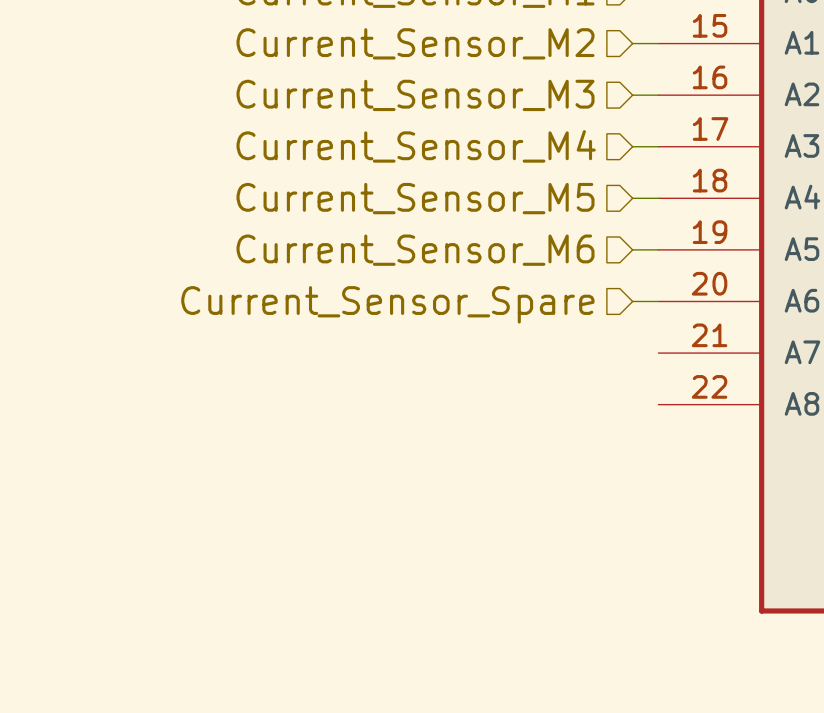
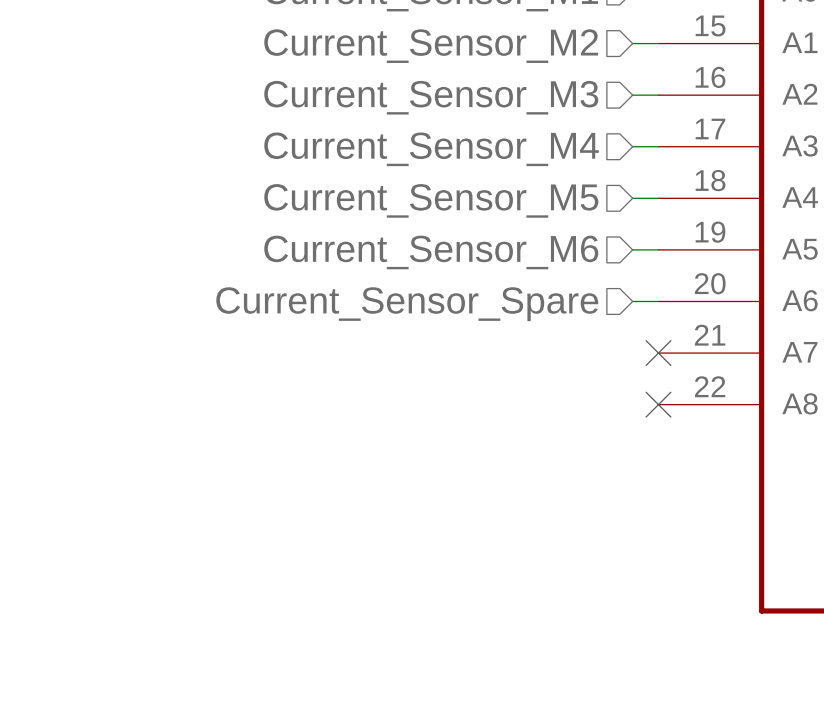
no-connect mark: none -> (658, 353)
no-connect mark: none -> (658, 404)

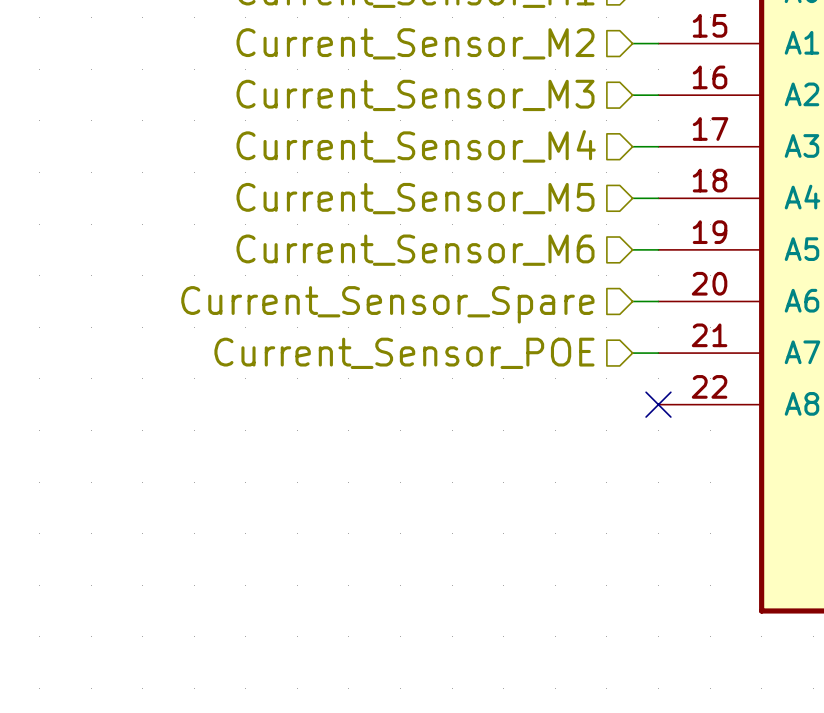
wire: none -> (632, 353) (658, 353)
no-connect mark: (658, 353) -> none
hierarchical label: none -> Current_Sensor_POE (404, 353)

